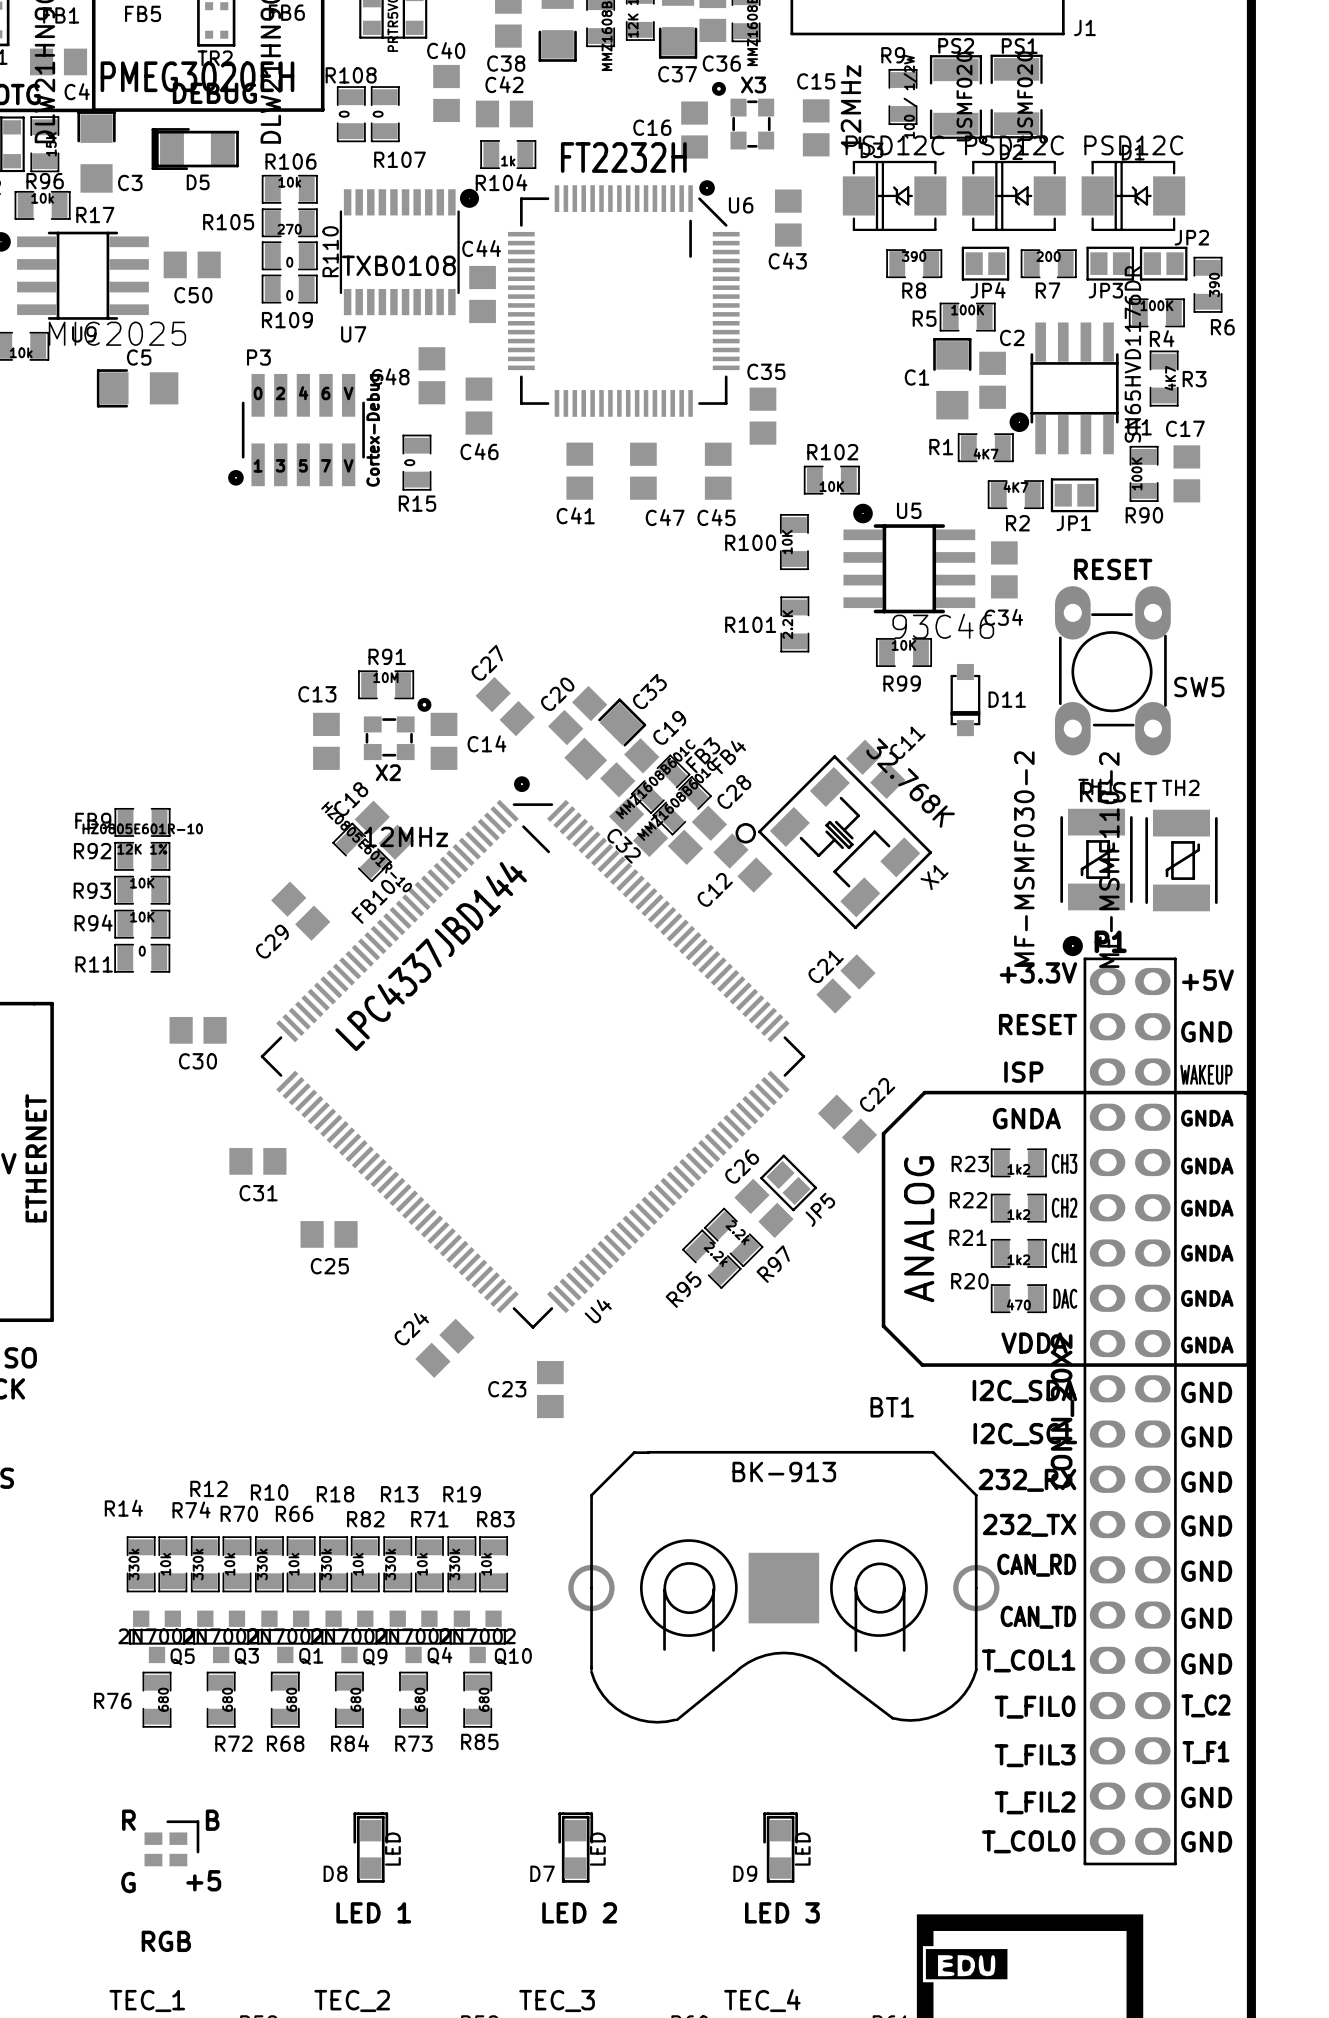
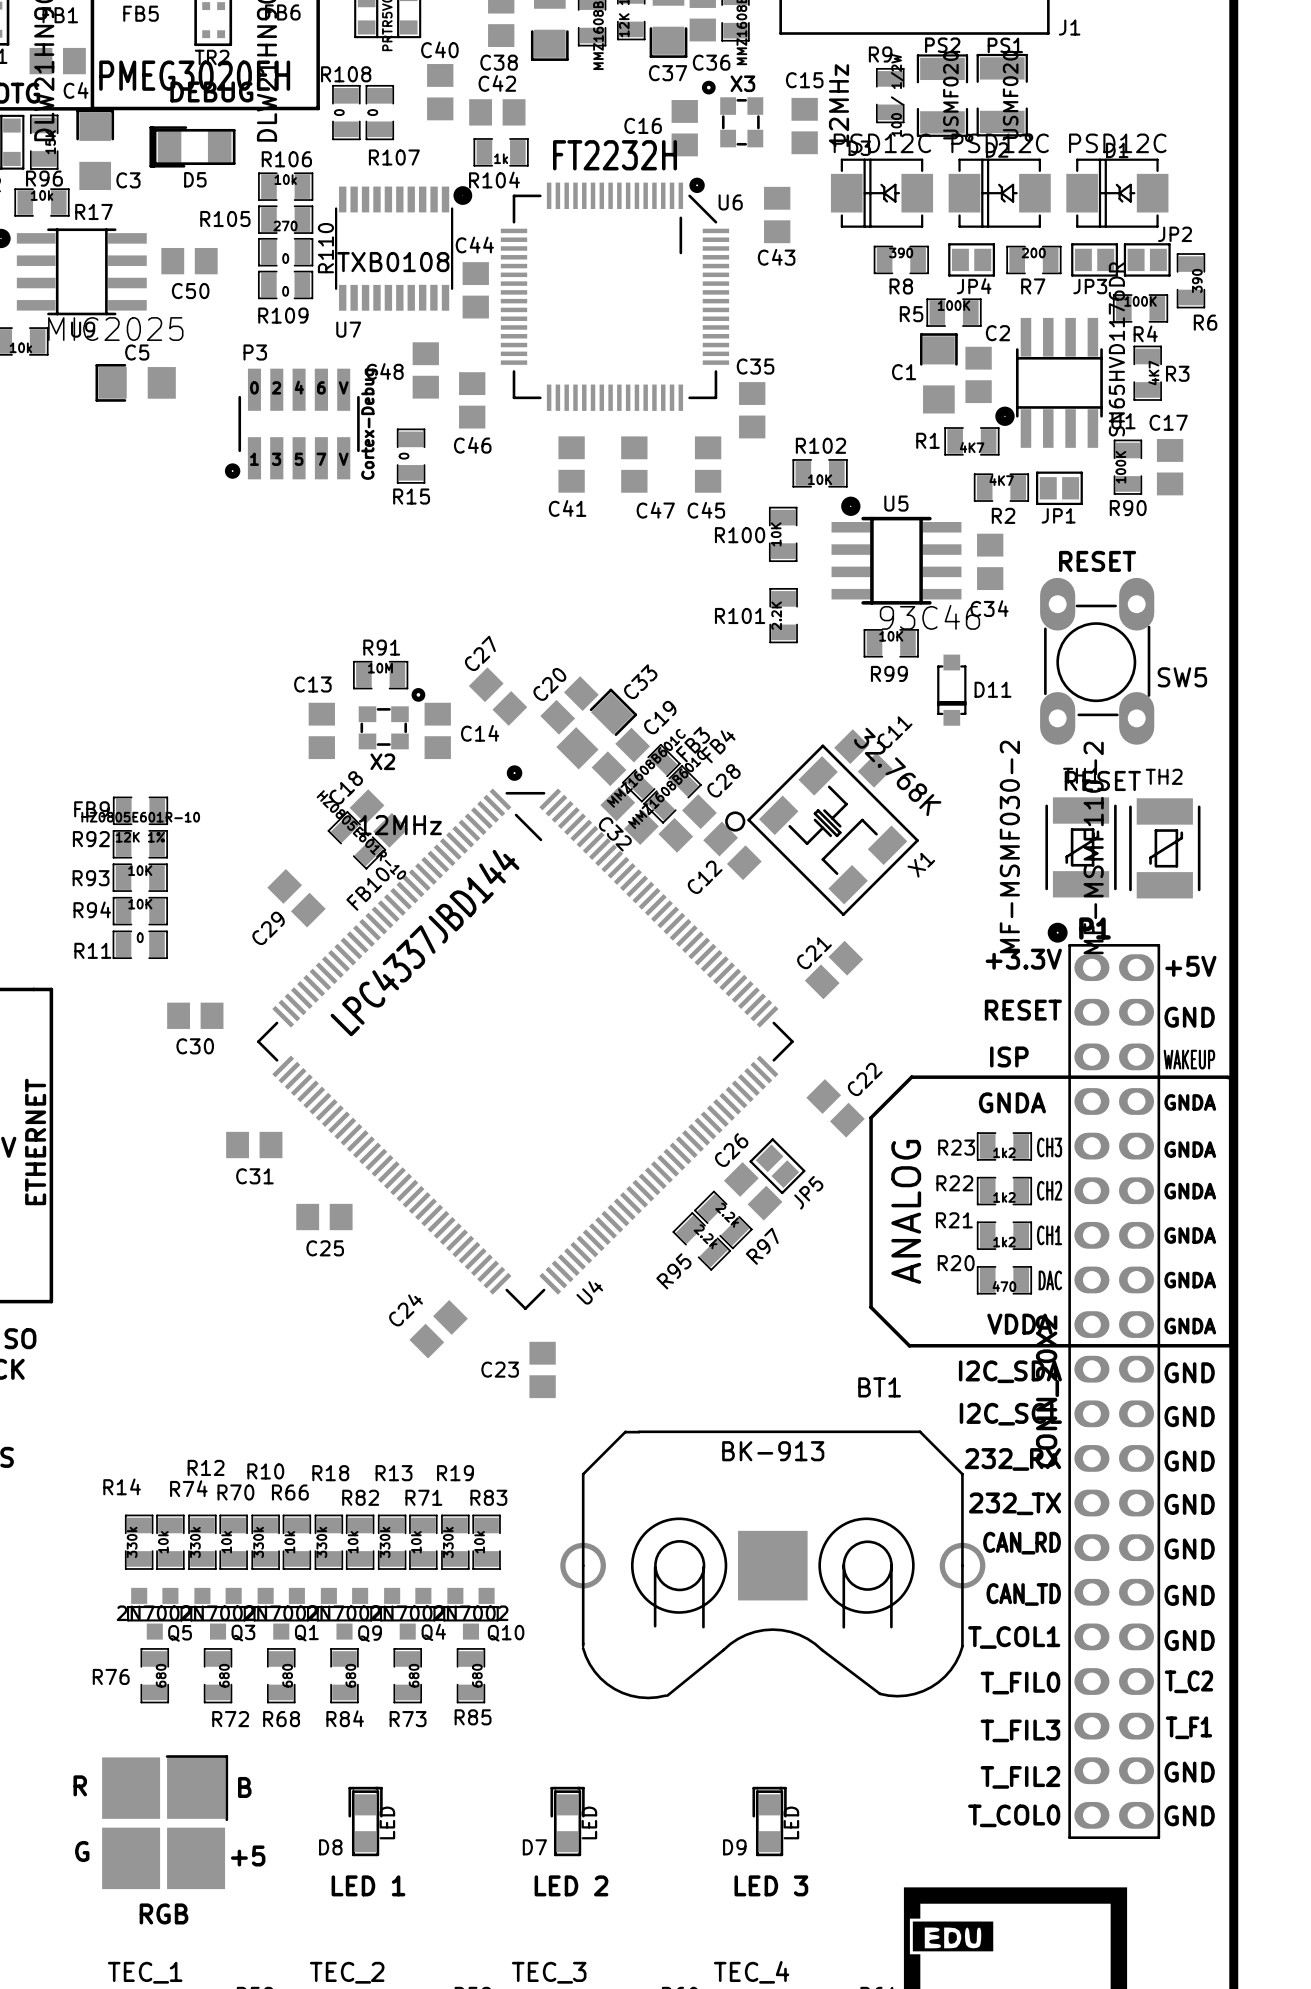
text position: R (128, 1820) -> R (80, 1785)
part footprint: [144, 1820, 200, 1867] -> [102, 1755, 229, 1890]
text position: B (212, 1820) -> B (244, 1787)
text position: +5 (203, 1880) -> +5 (248, 1855)
text position: G (128, 1882) -> G (82, 1851)

